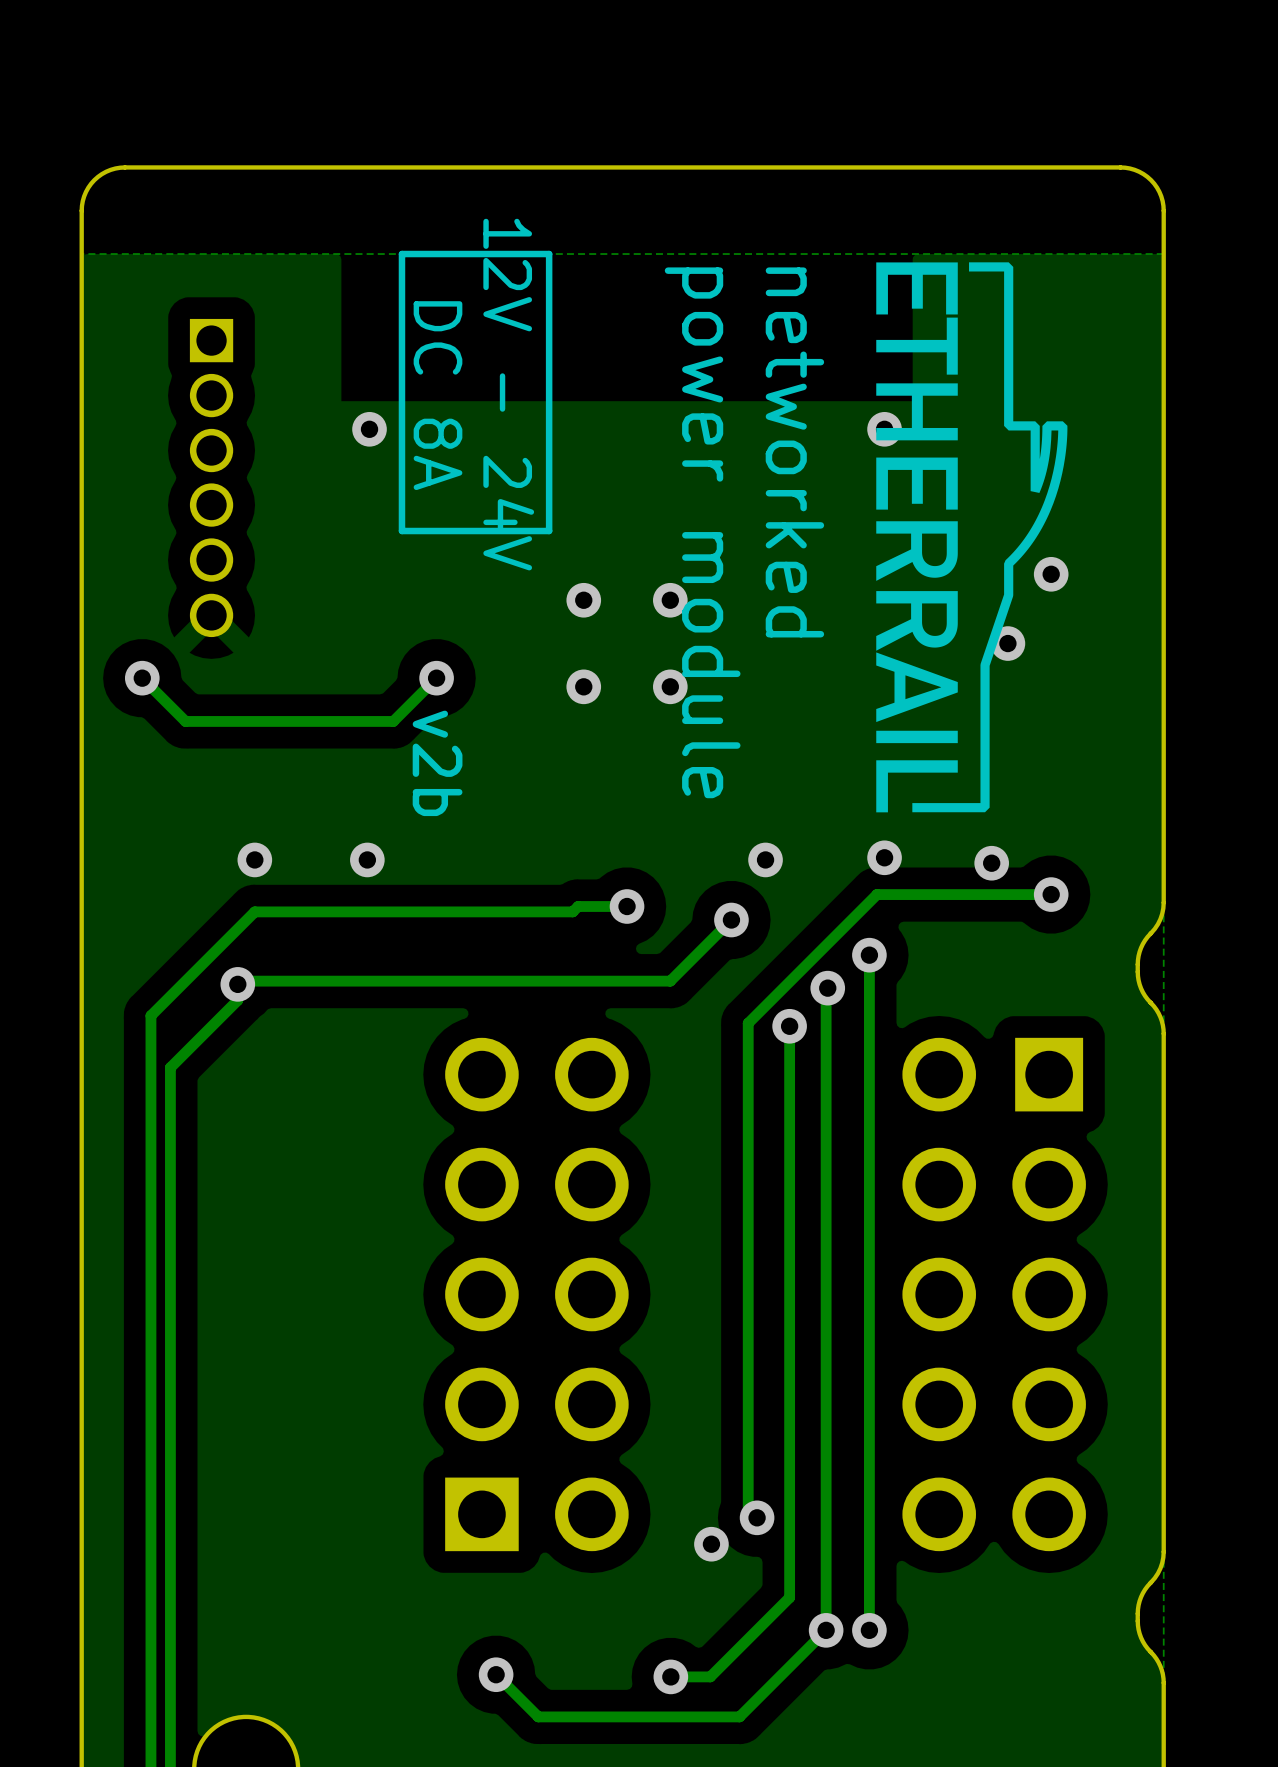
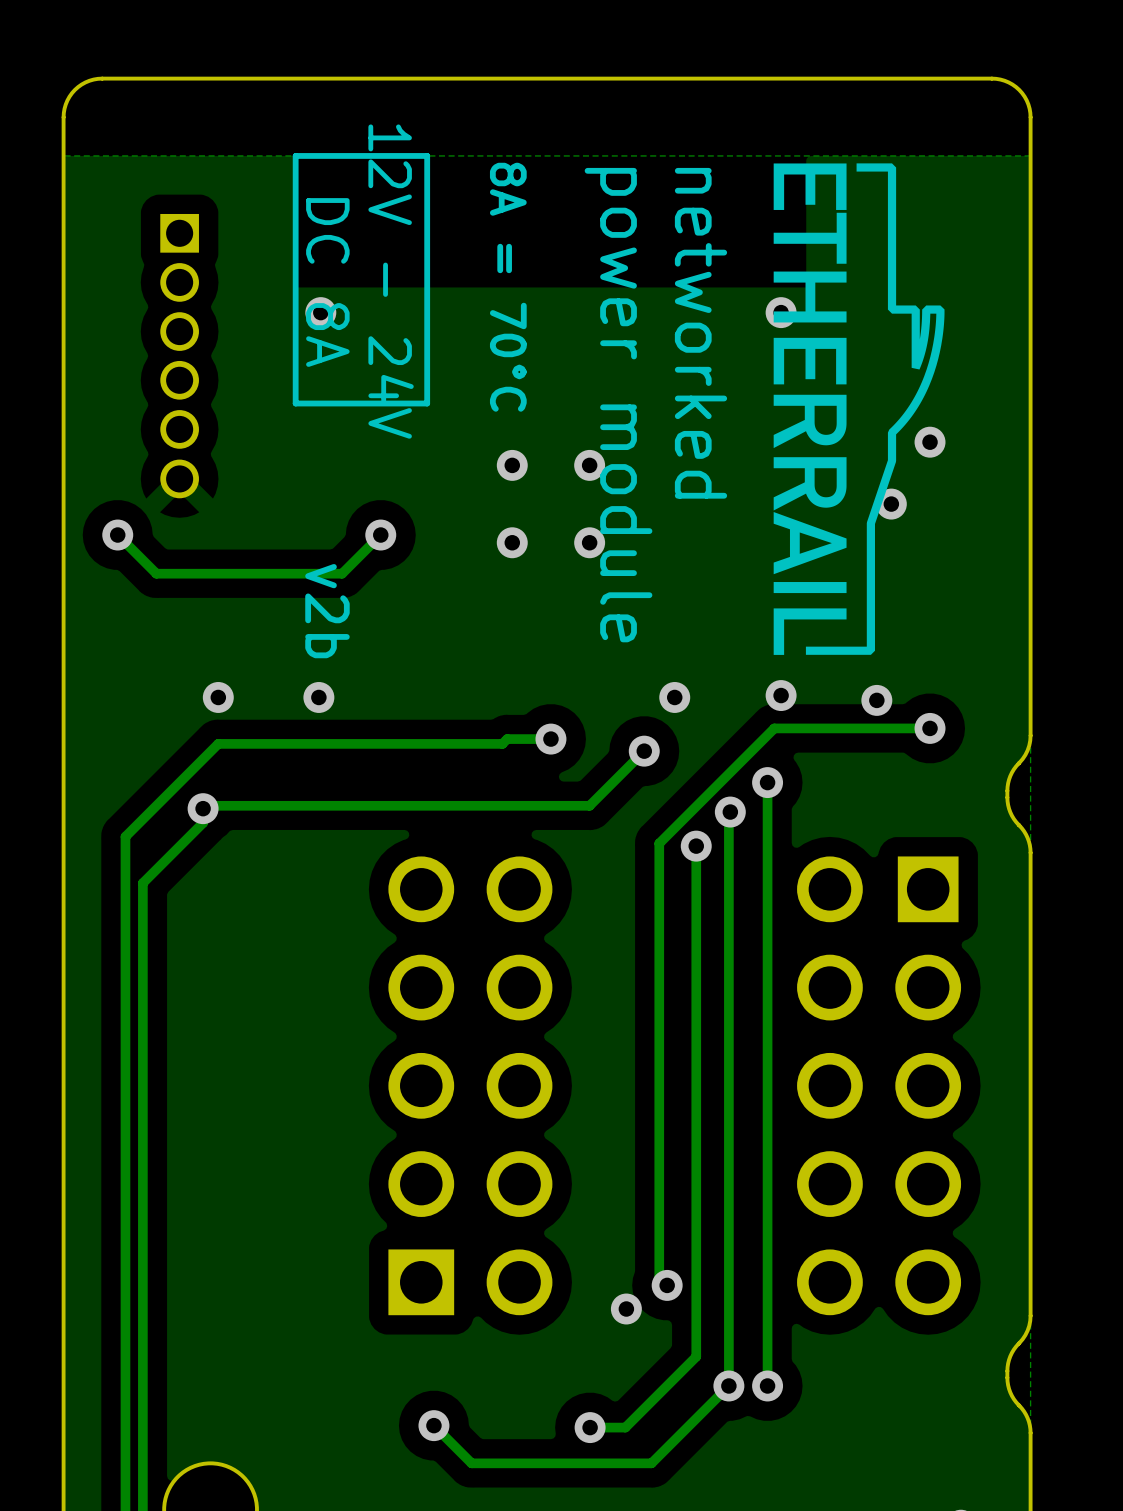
line: (401, 254) (401, 531) -> (349, 155) (295, 155) (295, 403) (349, 403)
line: (488, 254) (549, 254) (549, 531) (488, 531) -> (427, 155) (427, 403)
text position: 12V - 24V (508, 394) -> 12V - 24V (391, 281)
text position: DC 8A (438, 395) -> DC 8A (327, 282)
text: none -> 8A = 70°C (508, 287)
text position: v2b (437, 763) -> v2b (327, 611)

